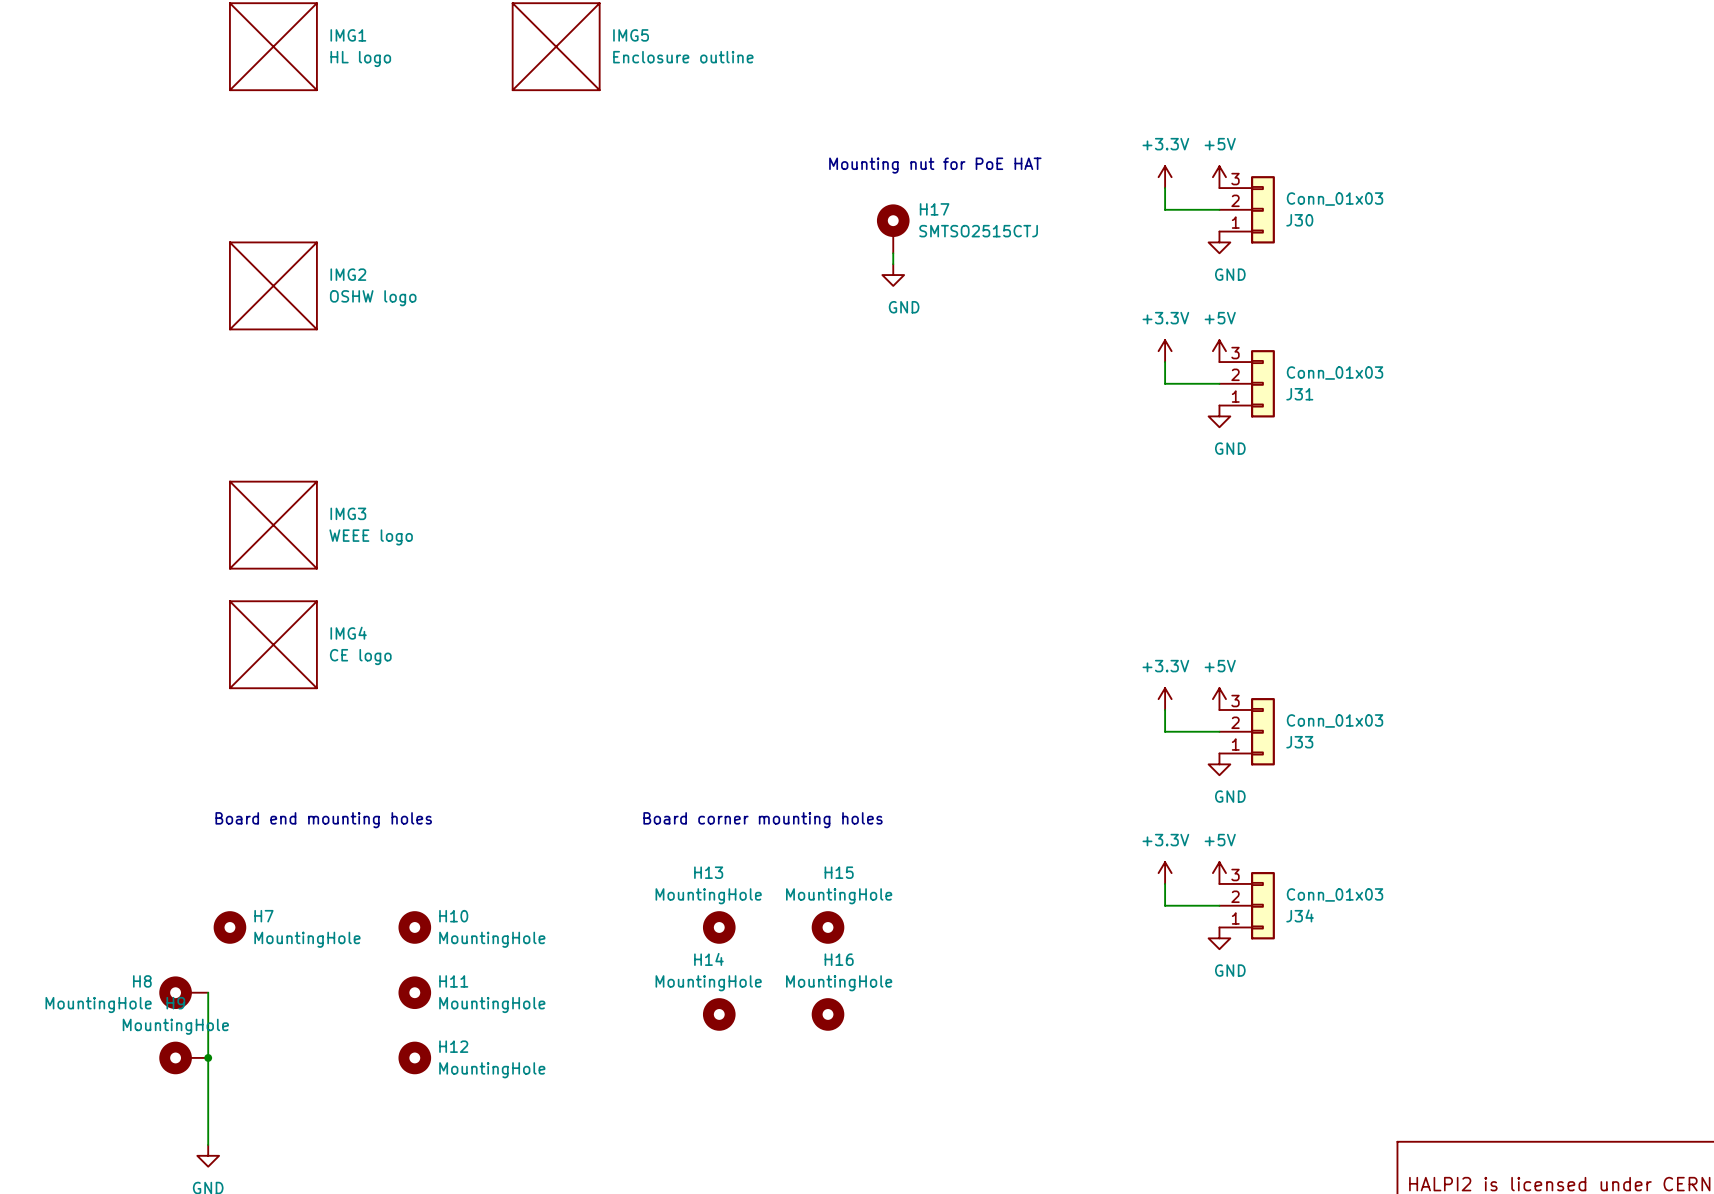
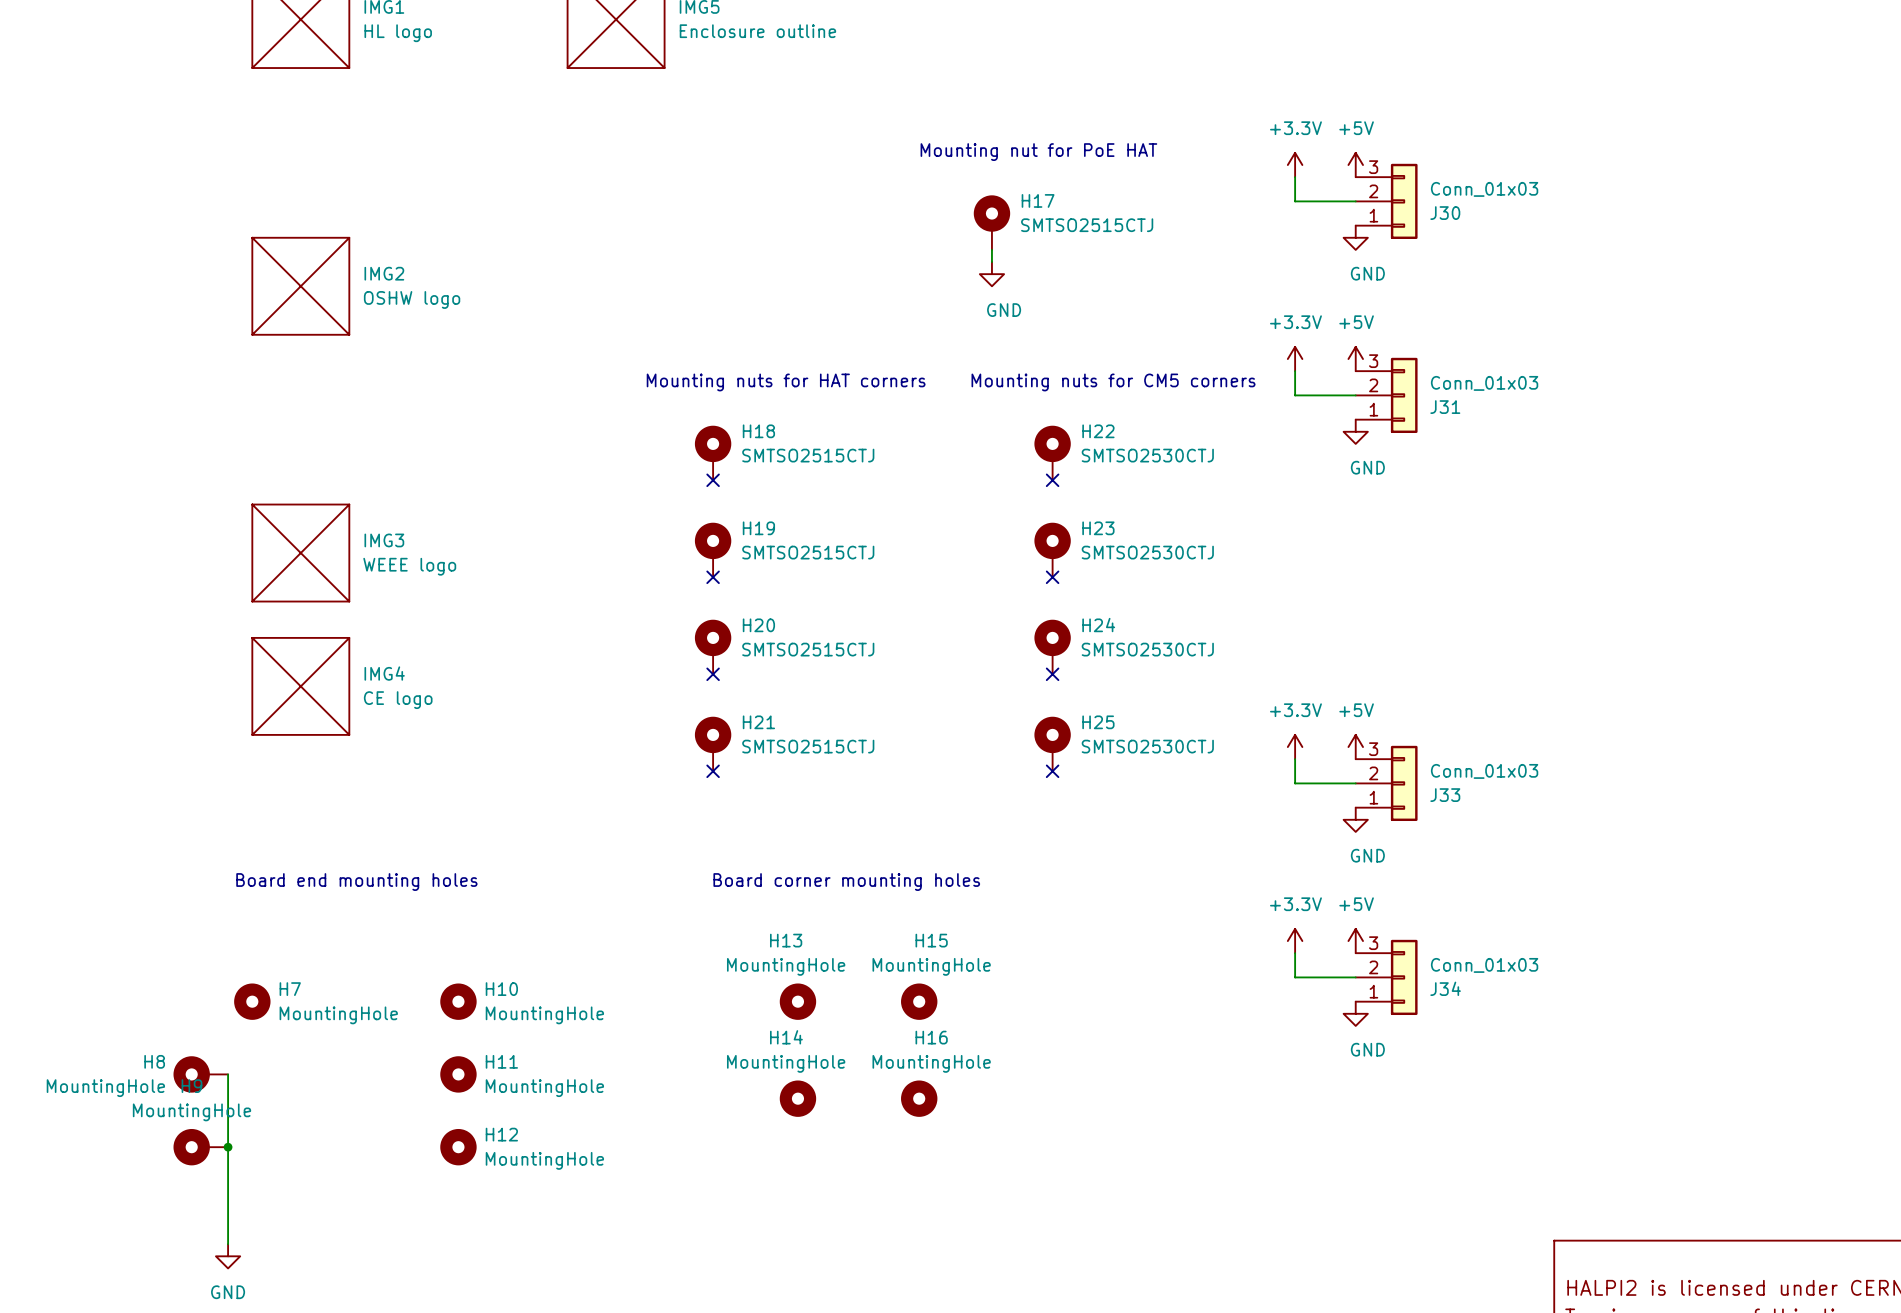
text: none -> Mounting nuts for HAT corners (786, 382)
text: none -> Mounting nuts for CM5 corners (1113, 382)
H18: none -> SMTSO2515CTJ (713, 453)
H22: none -> SMTSO2530CTJ (1052, 453)
no-connect mark: none -> (713, 480)
no-connect mark: none -> (1052, 480)
H19: none -> SMTSO2515CTJ (713, 550)
H23: none -> SMTSO2530CTJ (1052, 550)
no-connect mark: none -> (713, 577)
no-connect mark: none -> (1052, 577)
H20: none -> SMTSO2515CTJ (713, 647)
H24: none -> SMTSO2530CTJ (1052, 647)
no-connect mark: none -> (713, 674)
no-connect mark: none -> (1052, 674)
H21: none -> SMTSO2515CTJ (713, 744)
H25: none -> SMTSO2530CTJ (1052, 744)
no-connect mark: none -> (713, 771)
no-connect mark: none -> (1052, 771)

